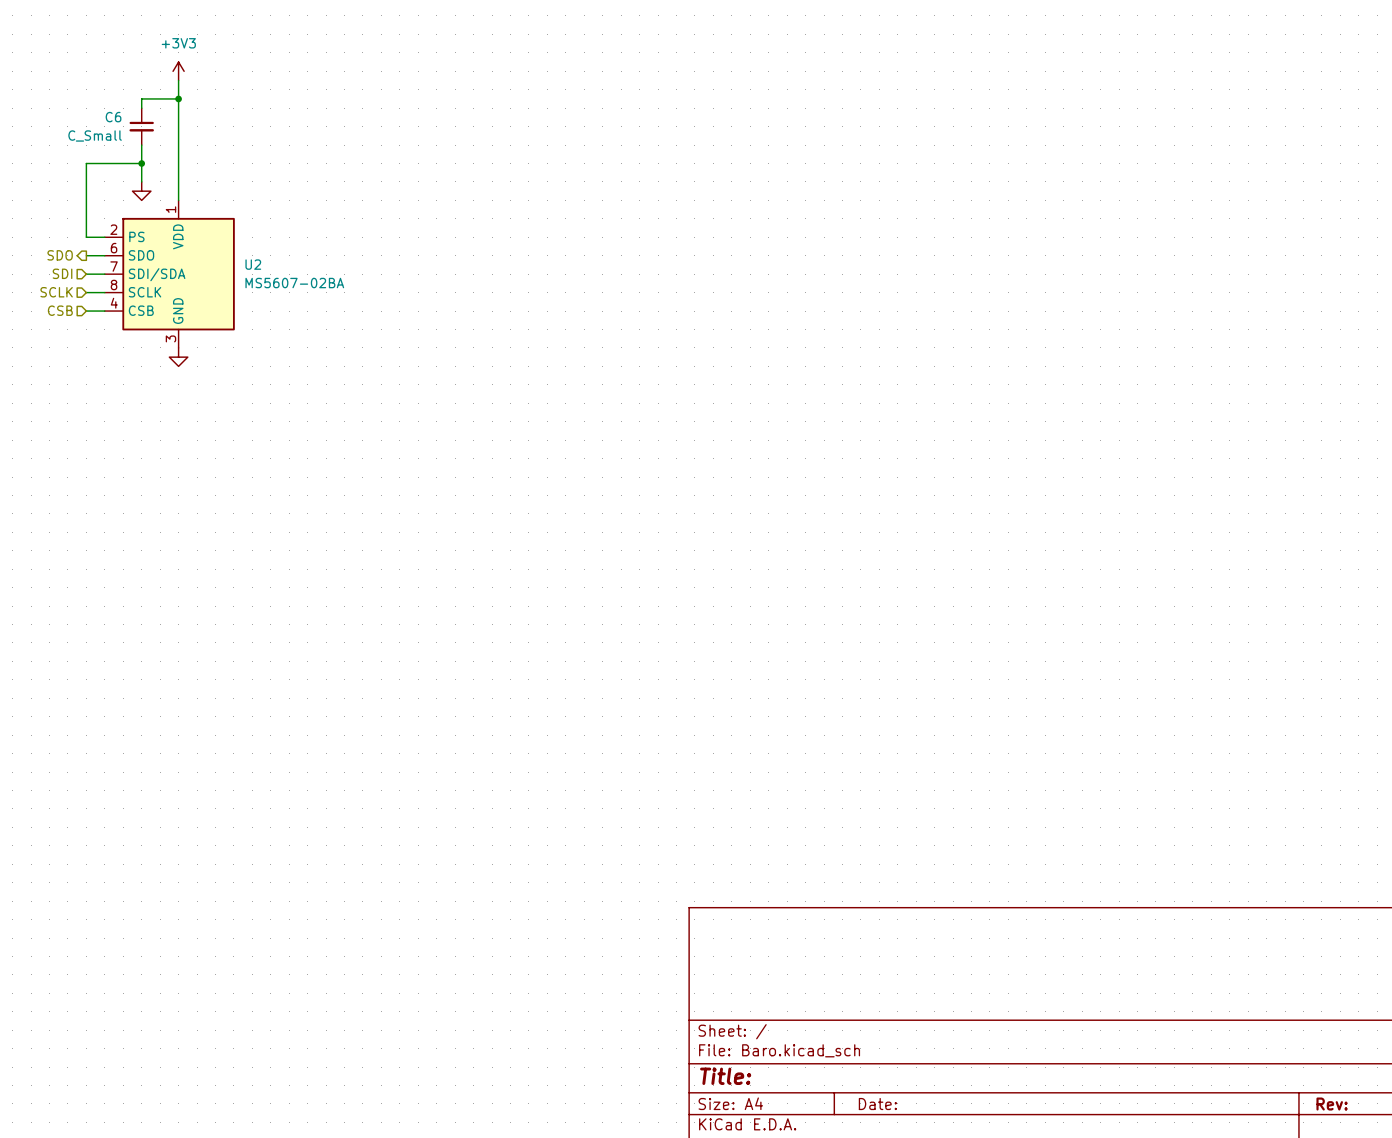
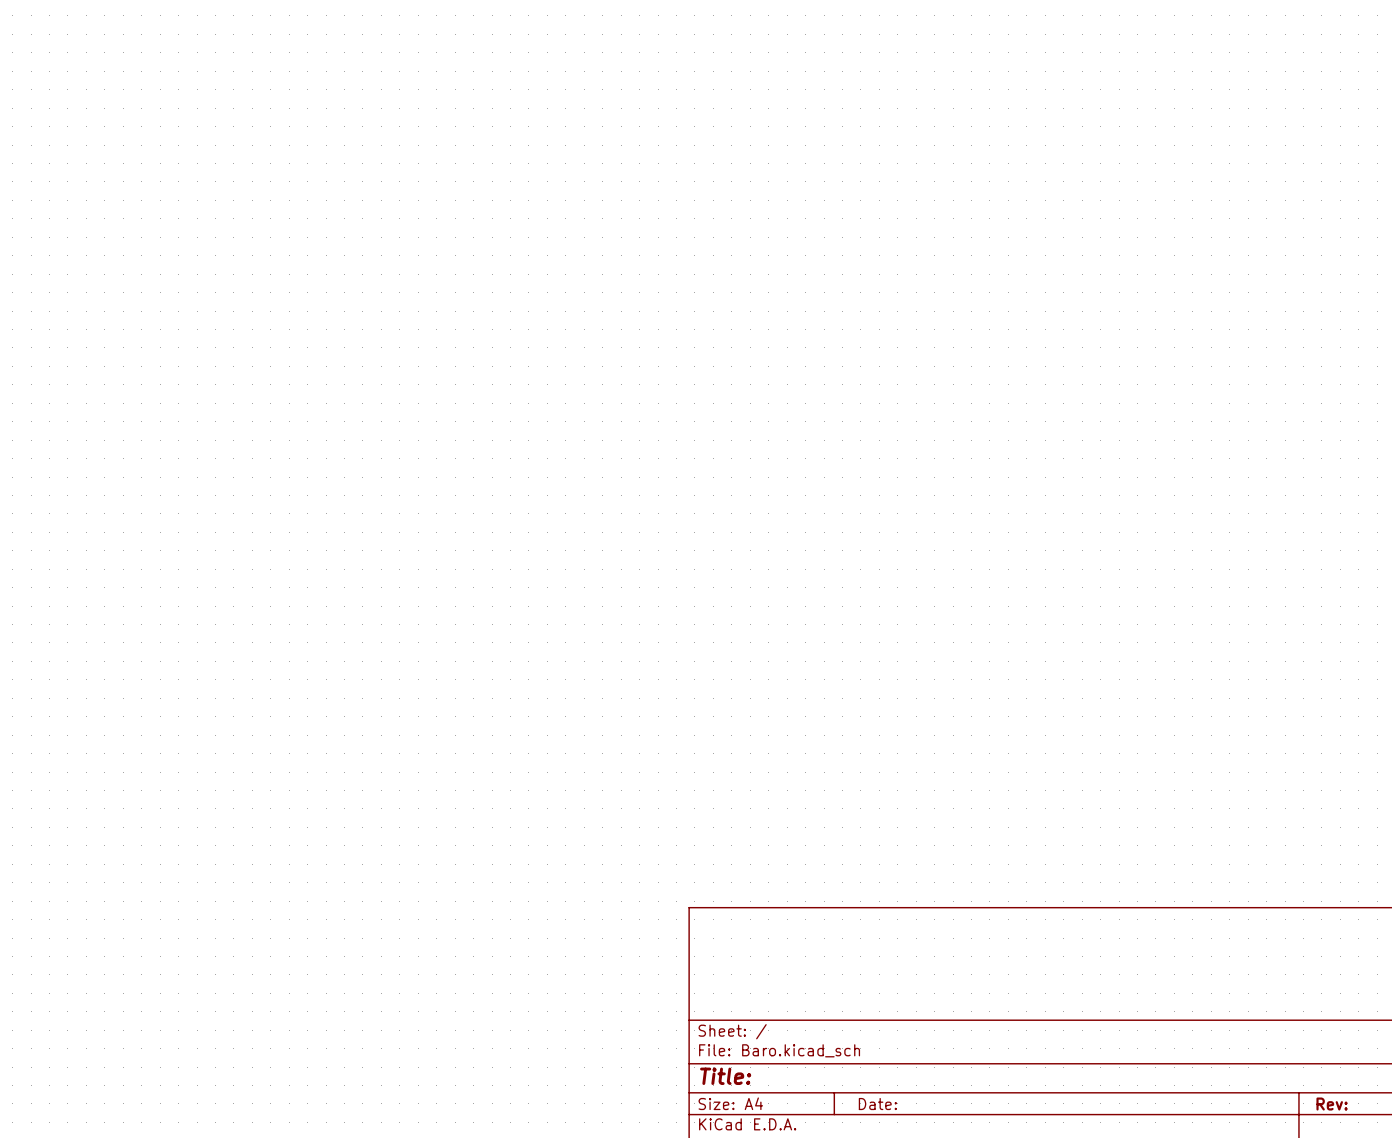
power symbol: +3V3 (178, 71) -> none
wire: (178, 80) (178, 200) -> none
wire: (178, 98) (141, 98) (141, 108) -> none
junction: (178, 98) -> none
C6: C_Small (141, 126) -> none
wire: (141, 145) (141, 181) -> none
wire: (141, 163) (86, 163) (86, 237) (104, 237) -> none
junction: (141, 163) -> none
power symbol: (141, 191) -> none
hierarchical label: SDO (60, 255) -> none
wire: (86, 255) (104, 255) -> none
hierarchical label: SDI (62, 273) -> none
wire: (86, 274) (104, 274) -> none
U2: MS5607-02BA (169, 274) -> none
hierarchical label: SCLK (56, 292) -> none
wire: (86, 292) (104, 292) -> none
hierarchical label: CSB (60, 310) -> none
wire: (86, 311) (104, 311) -> none
power symbol: (178, 357) -> none

